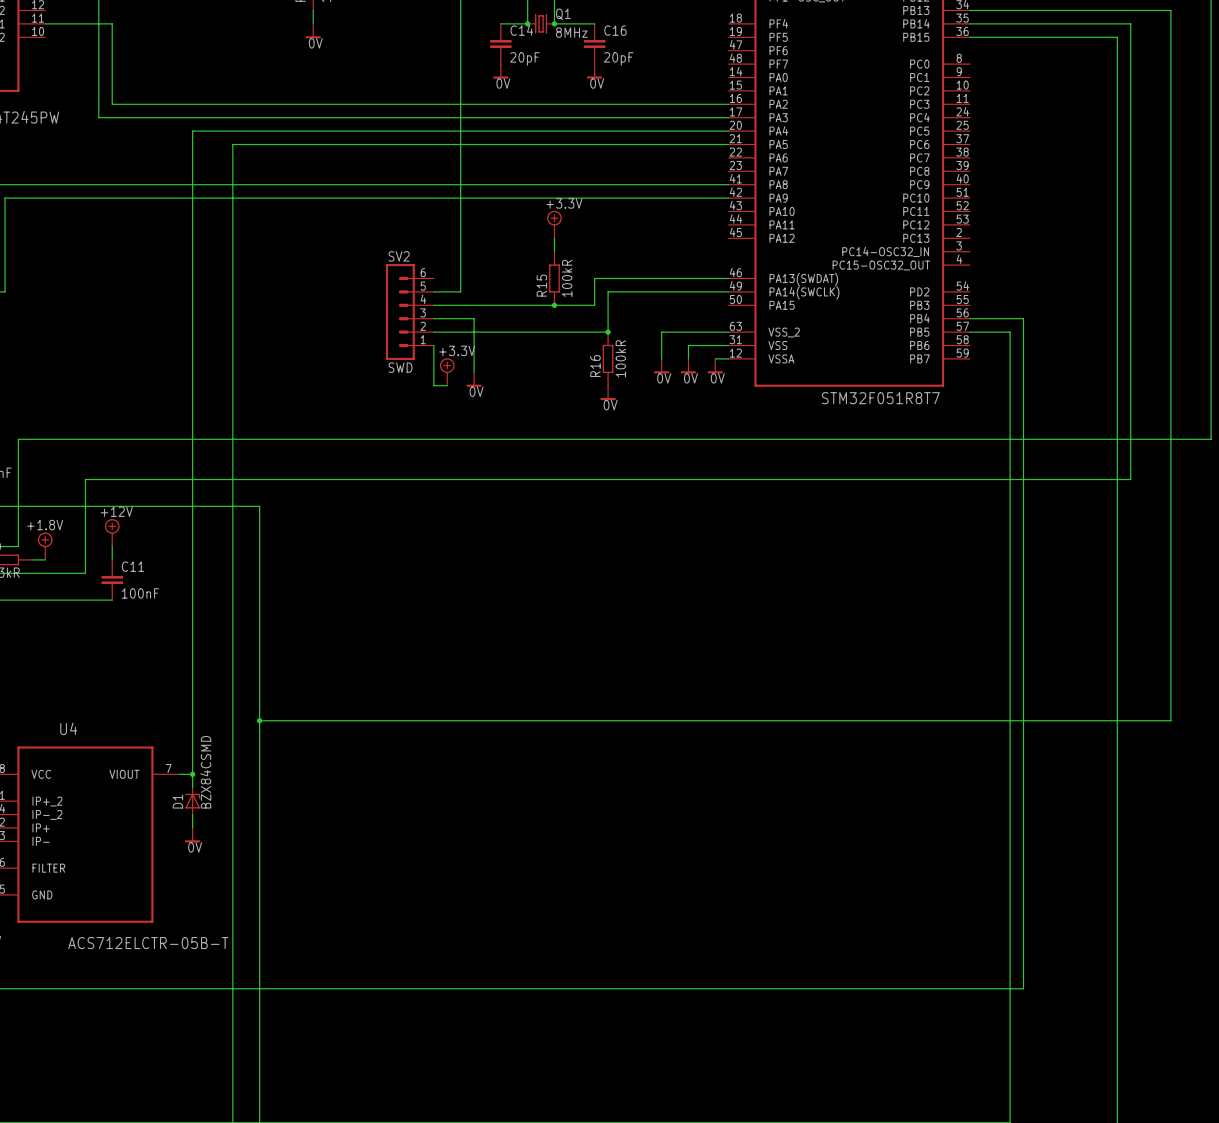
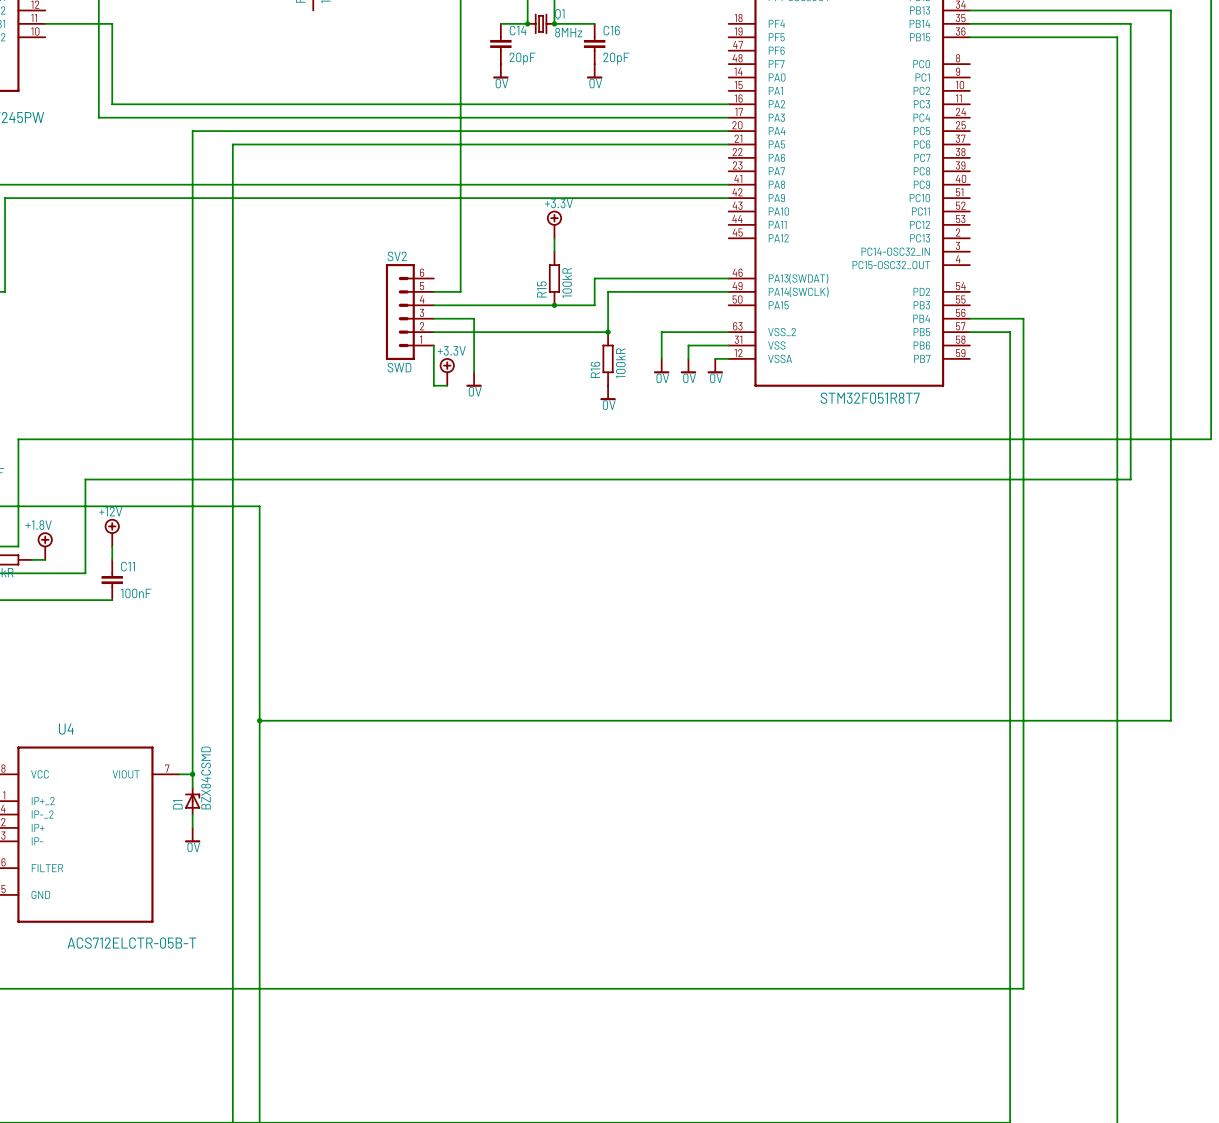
wire: (313, 10) (313, 23) -> none
power symbol: 0V (313, 31) -> none

